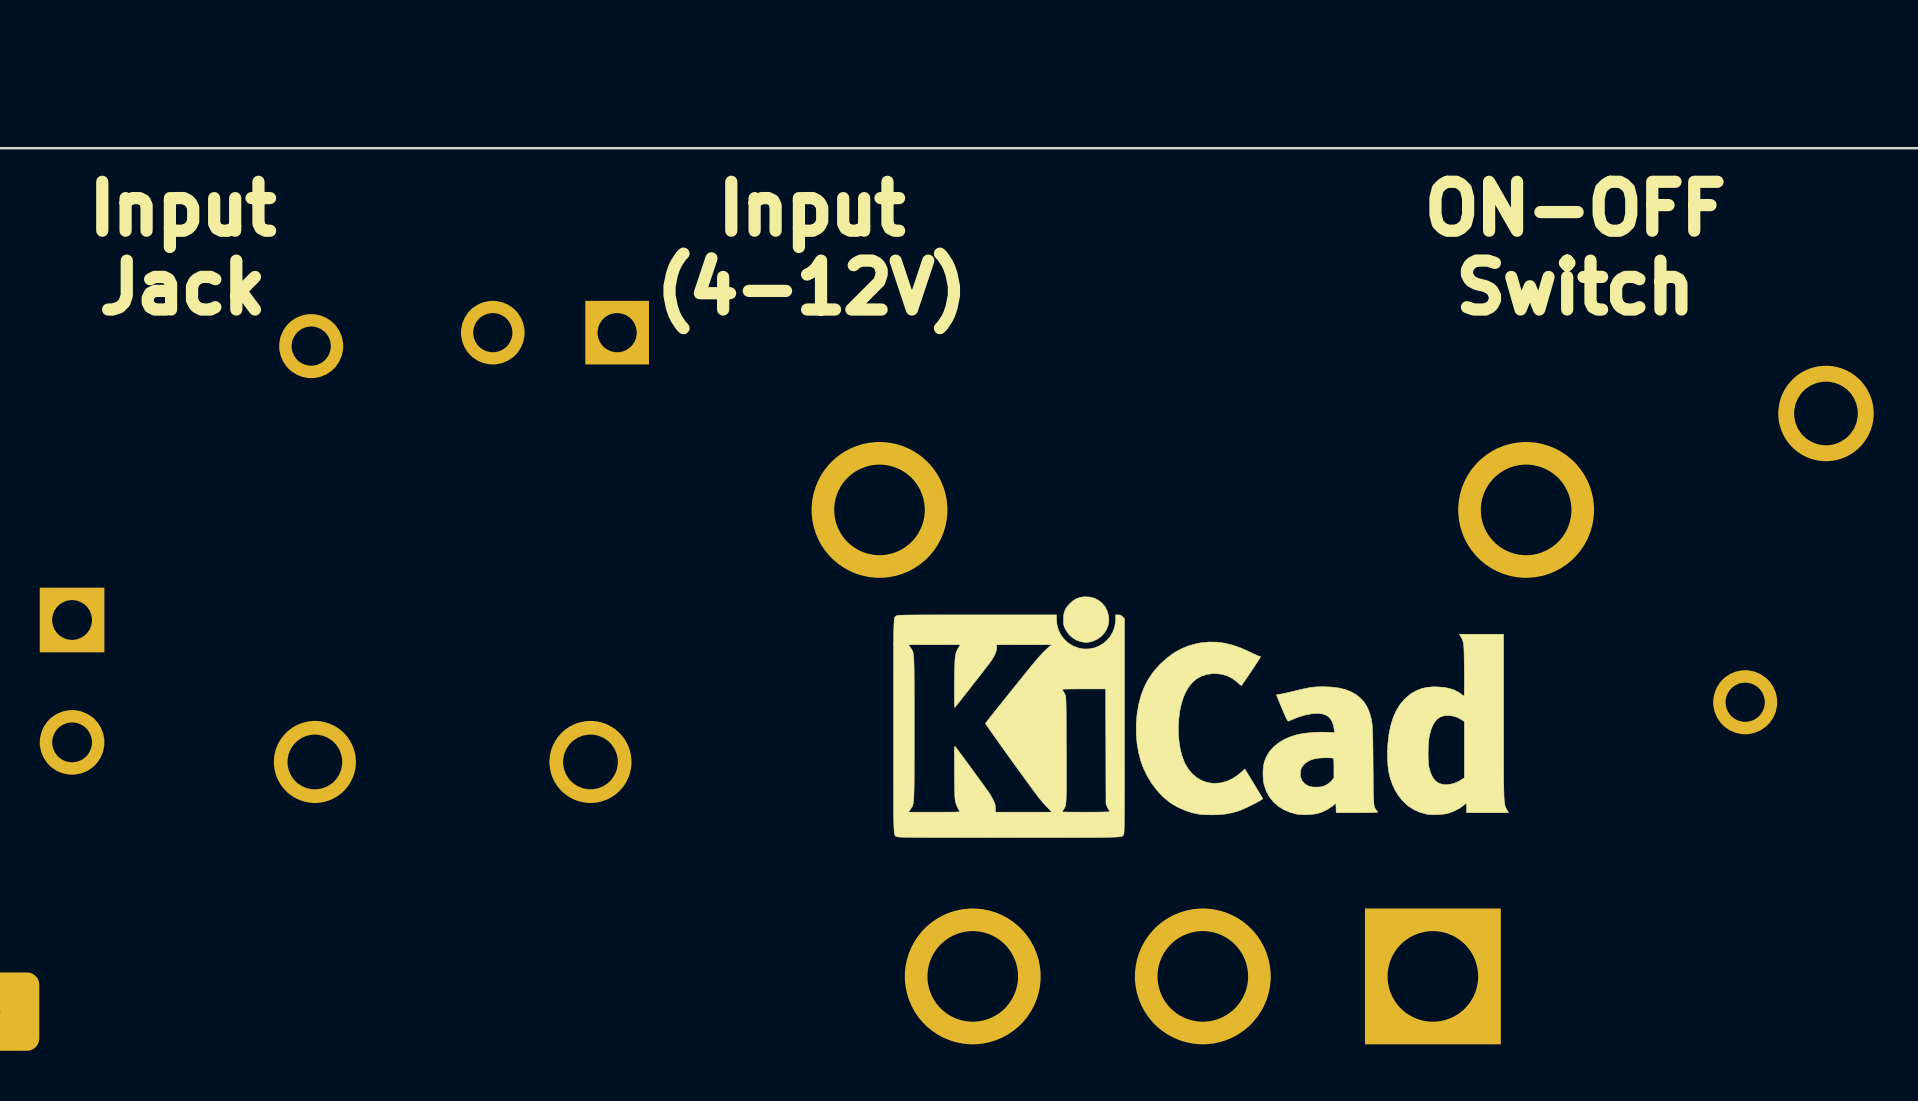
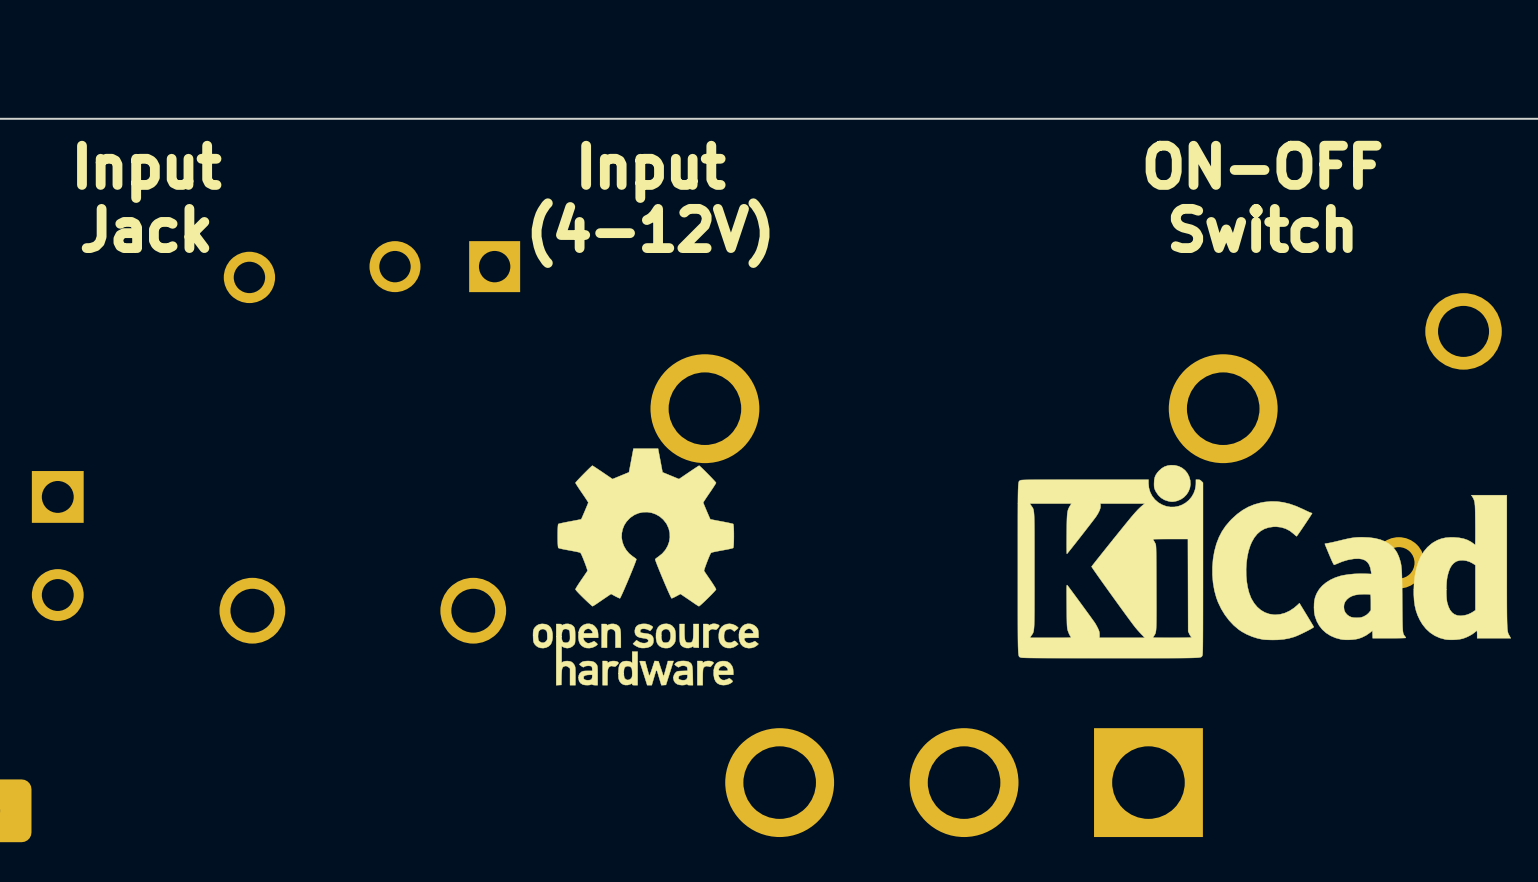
drawing: none -> [532, 448, 759, 686]
drawing position: (1201, 717) -> (1264, 561)

